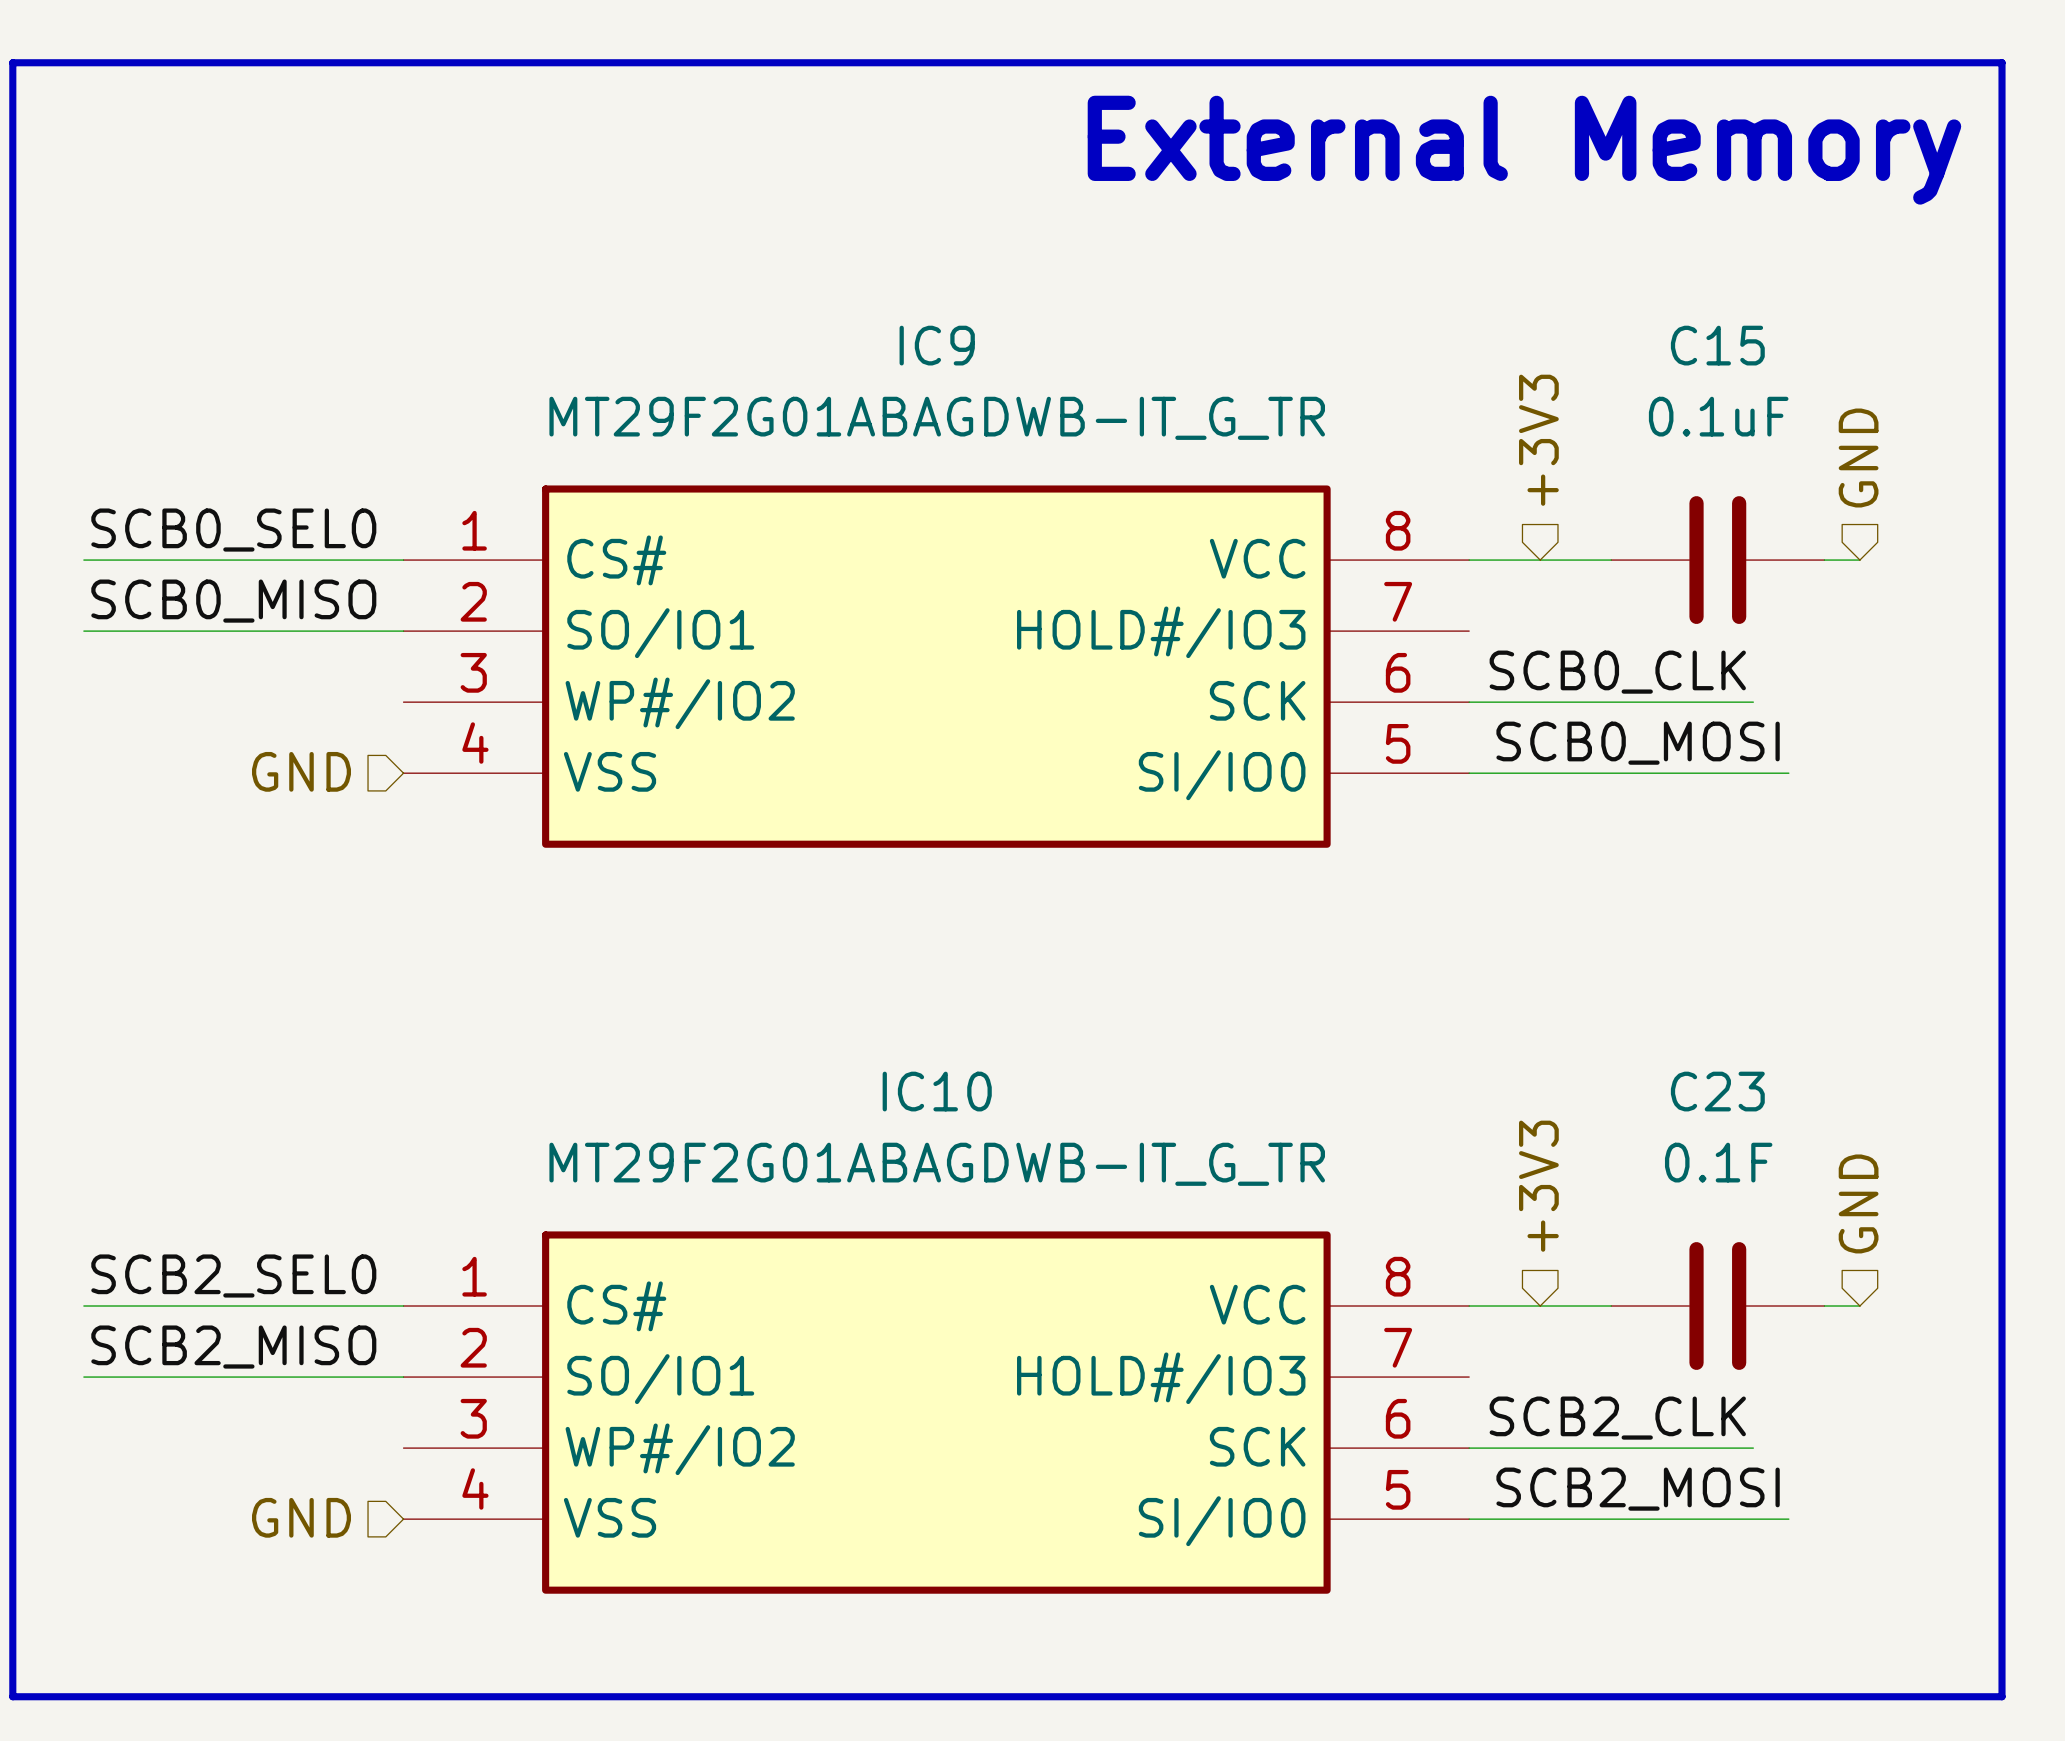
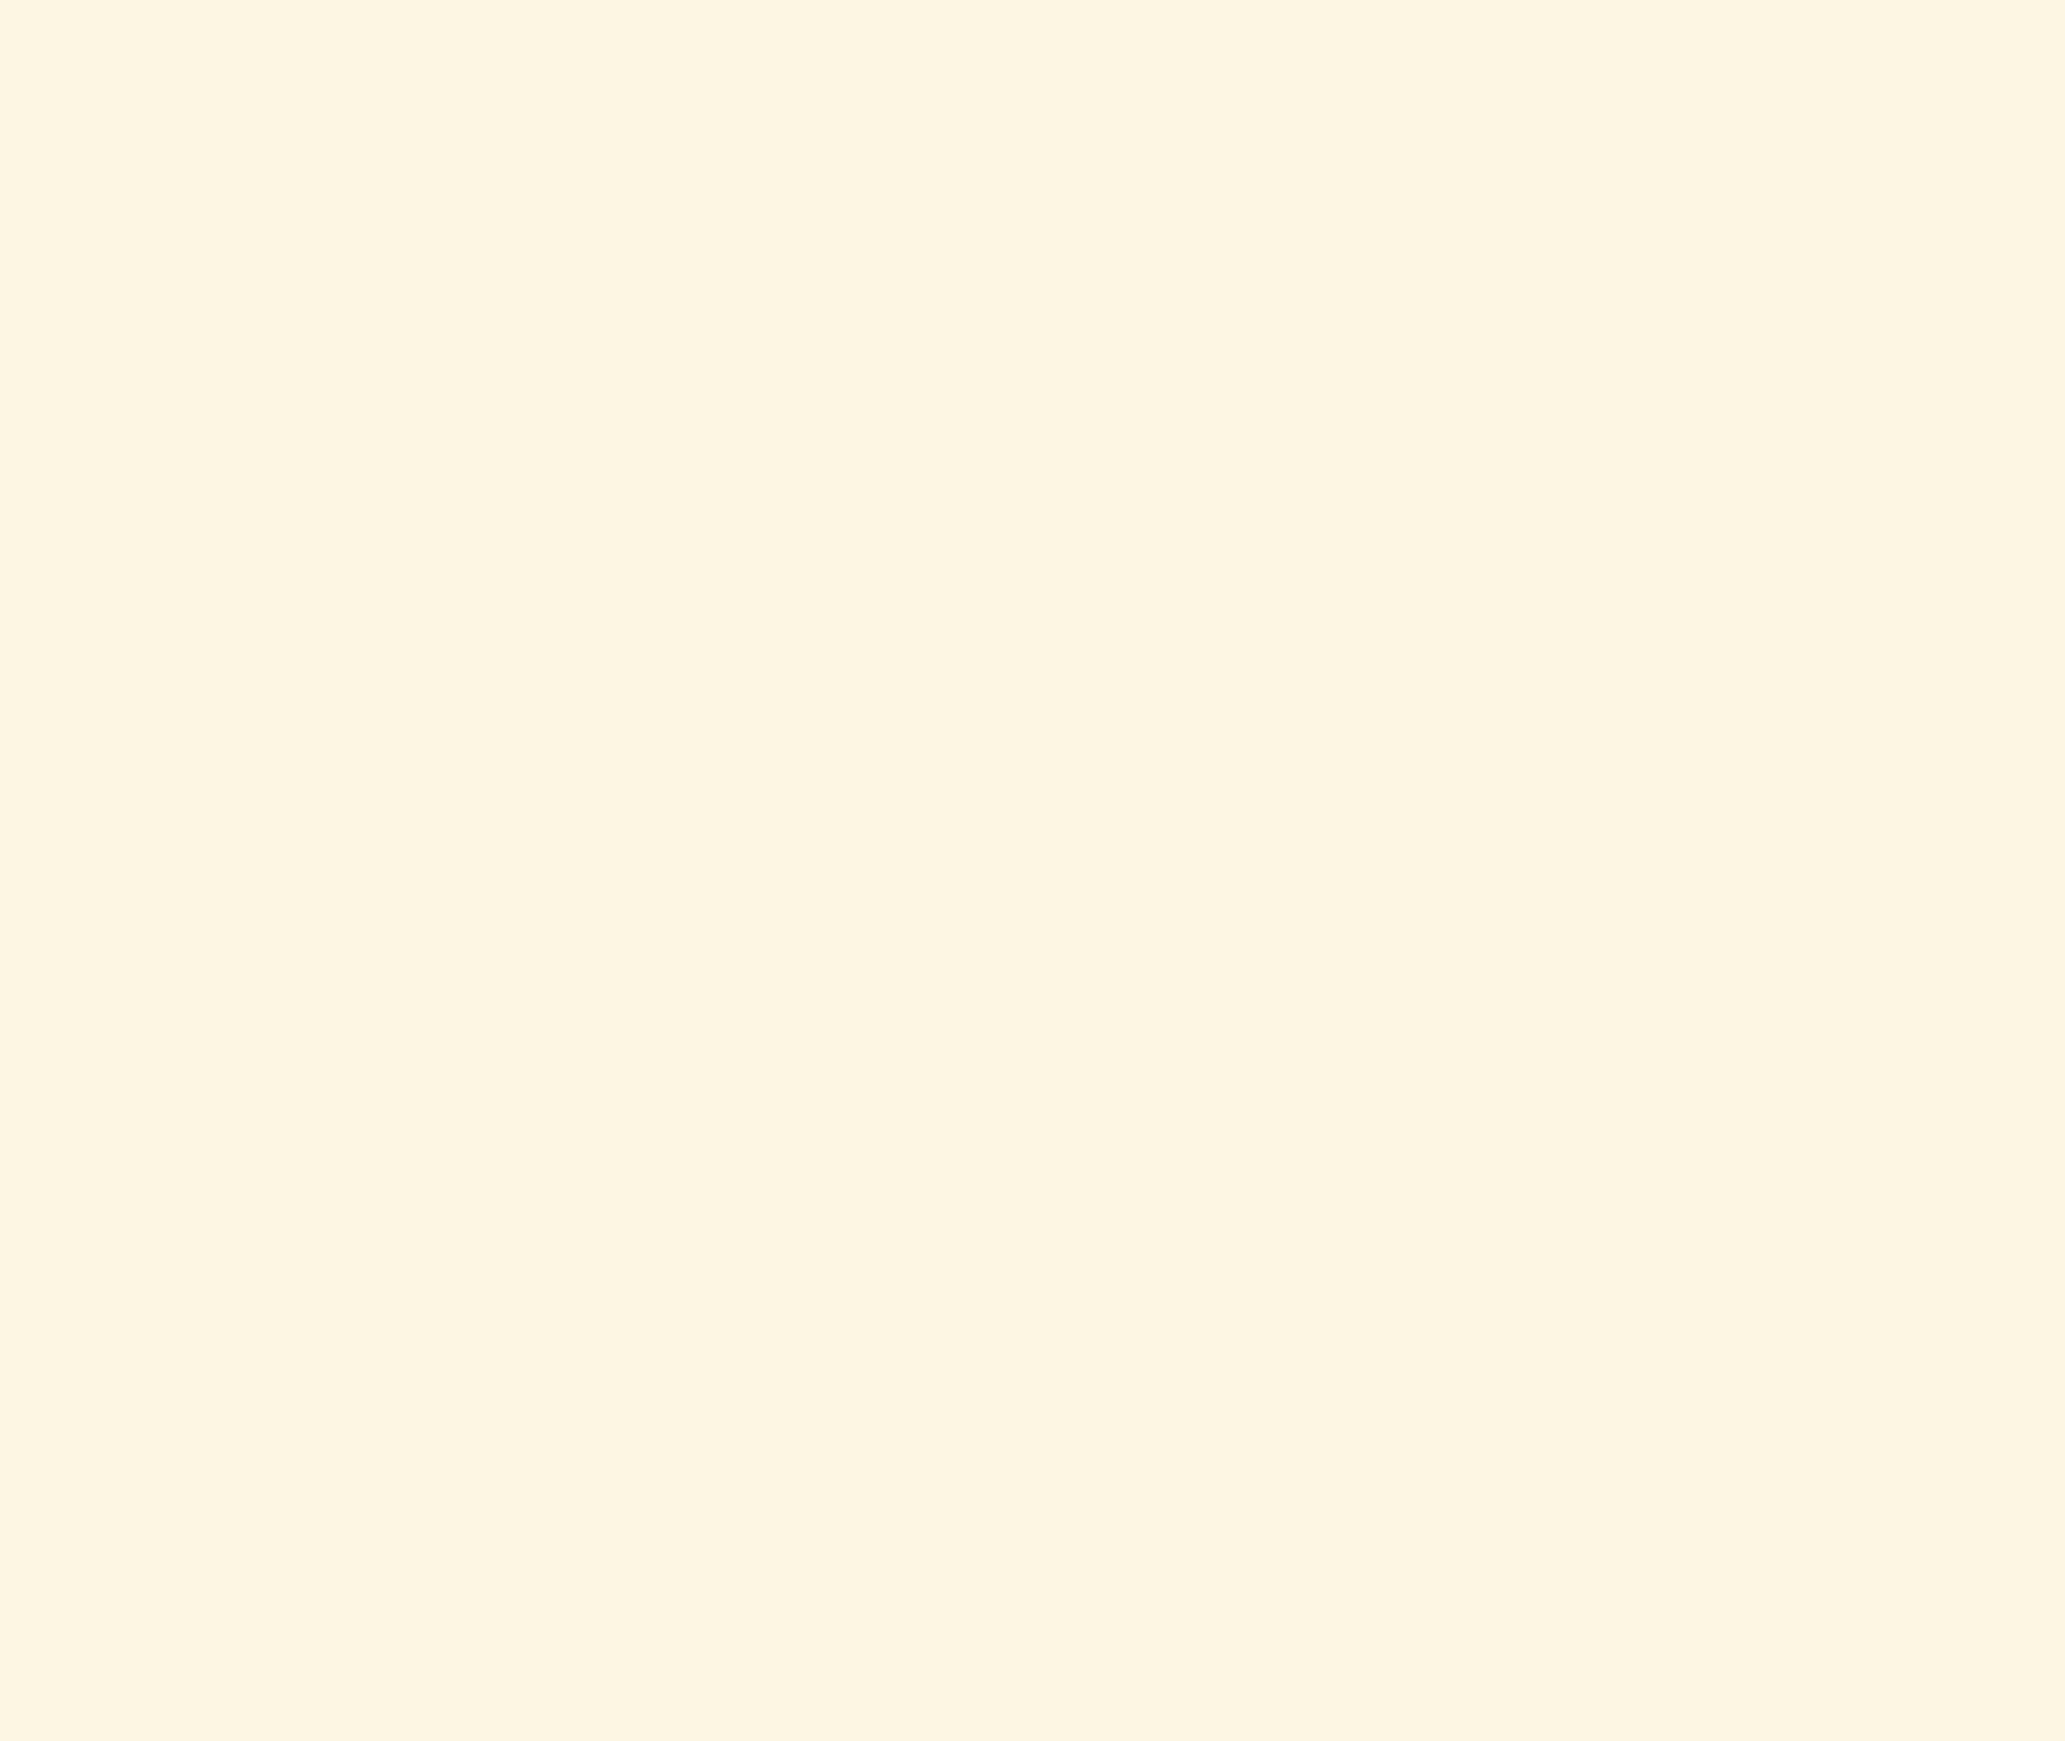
line: (12, 62) (2002, 62) (2002, 1696) (12, 1696) (12, 62) -> none
text: External Memory (1524, 150) -> none
hierarchical label: +3V3 (1538, 440) -> none
hierarchical label: GND (1858, 458) -> none
label: SCB0_SEL0 (233, 530) -> none
wire: (83, 560) (403, 560) -> none
wire: (1469, 560) (1611, 560) -> none
C15: 0.1uF (1717, 560) -> none
wire: (1824, 560) (1859, 560) -> none
label: SCB0_MISO (233, 601) -> none
wire: (83, 631) (403, 631) -> none
IC9: MT29F2G01ABAGDWB-IT_G_TR (936, 666) -> none
label: SCB0_CLK (1617, 672) -> none
wire: (1469, 702) (1753, 702) -> none
label: SCB0_MOSI (1638, 743) -> none
hierarchical label: GND (301, 771) -> none
wire: (1469, 773) (1788, 773) -> none
hierarchical label: +3V3 (1538, 1186) -> none
hierarchical label: GND (1858, 1203) -> none
label: SCB2_SEL0 (233, 1275) -> none
wire: (83, 1306) (403, 1306) -> none
wire: (1469, 1306) (1611, 1306) -> none
C23: 0.1F (1717, 1306) -> none
wire: (1824, 1306) (1859, 1306) -> none
label: SCB2_MISO (233, 1347) -> none
wire: (83, 1377) (403, 1377) -> none
IC10: MT29F2G01ABAGDWB-IT_G_TR (936, 1412) -> none
label: SCB2_CLK (1617, 1418) -> none
wire: (1469, 1448) (1753, 1448) -> none
label: SCB2_MOSI (1638, 1489) -> none
hierarchical label: GND (301, 1517) -> none
wire: (1469, 1519) (1788, 1519) -> none

